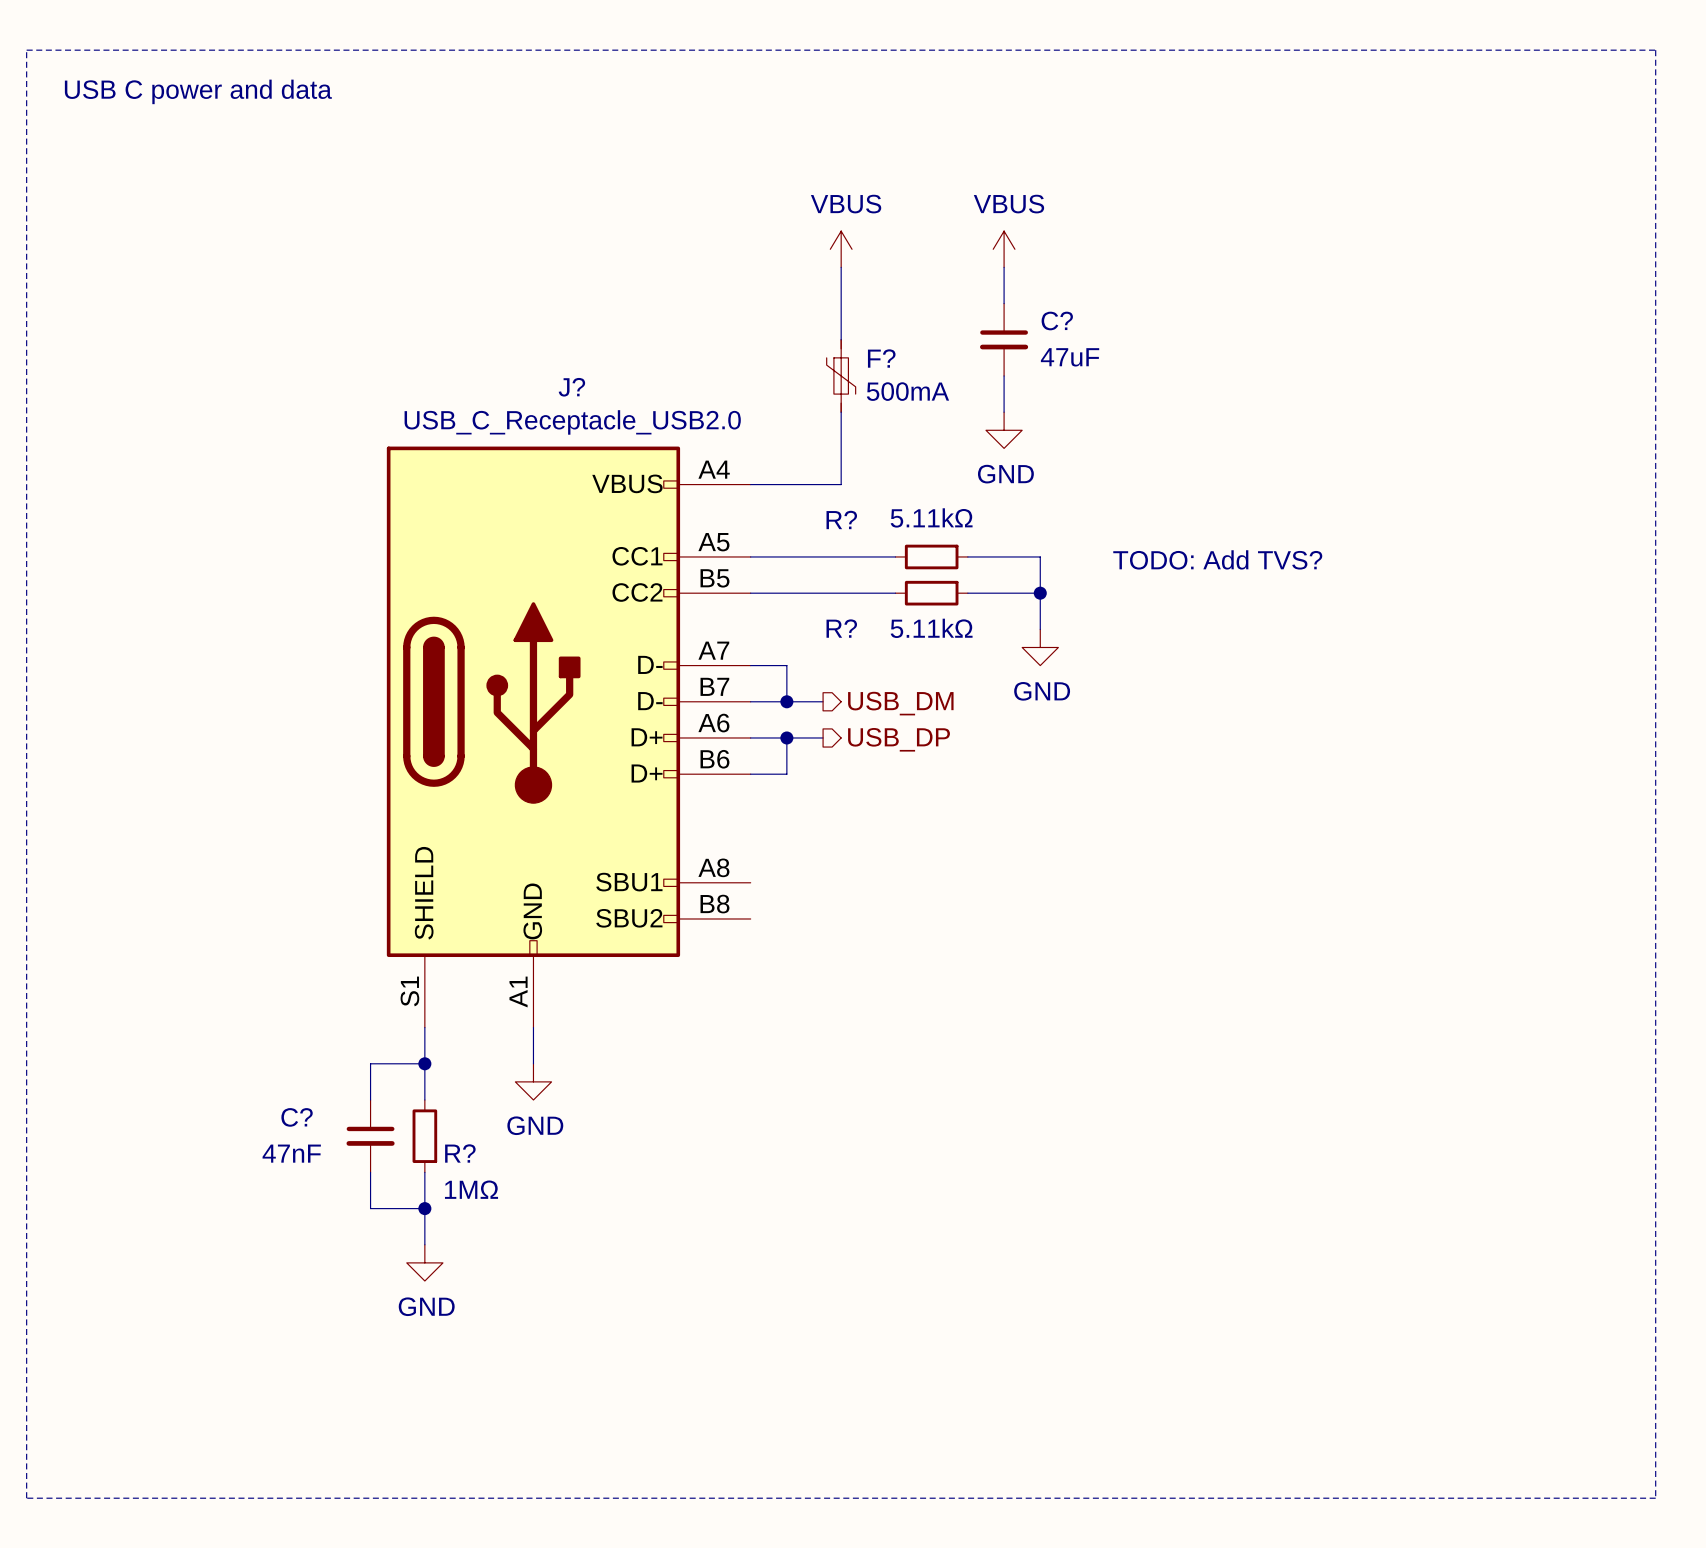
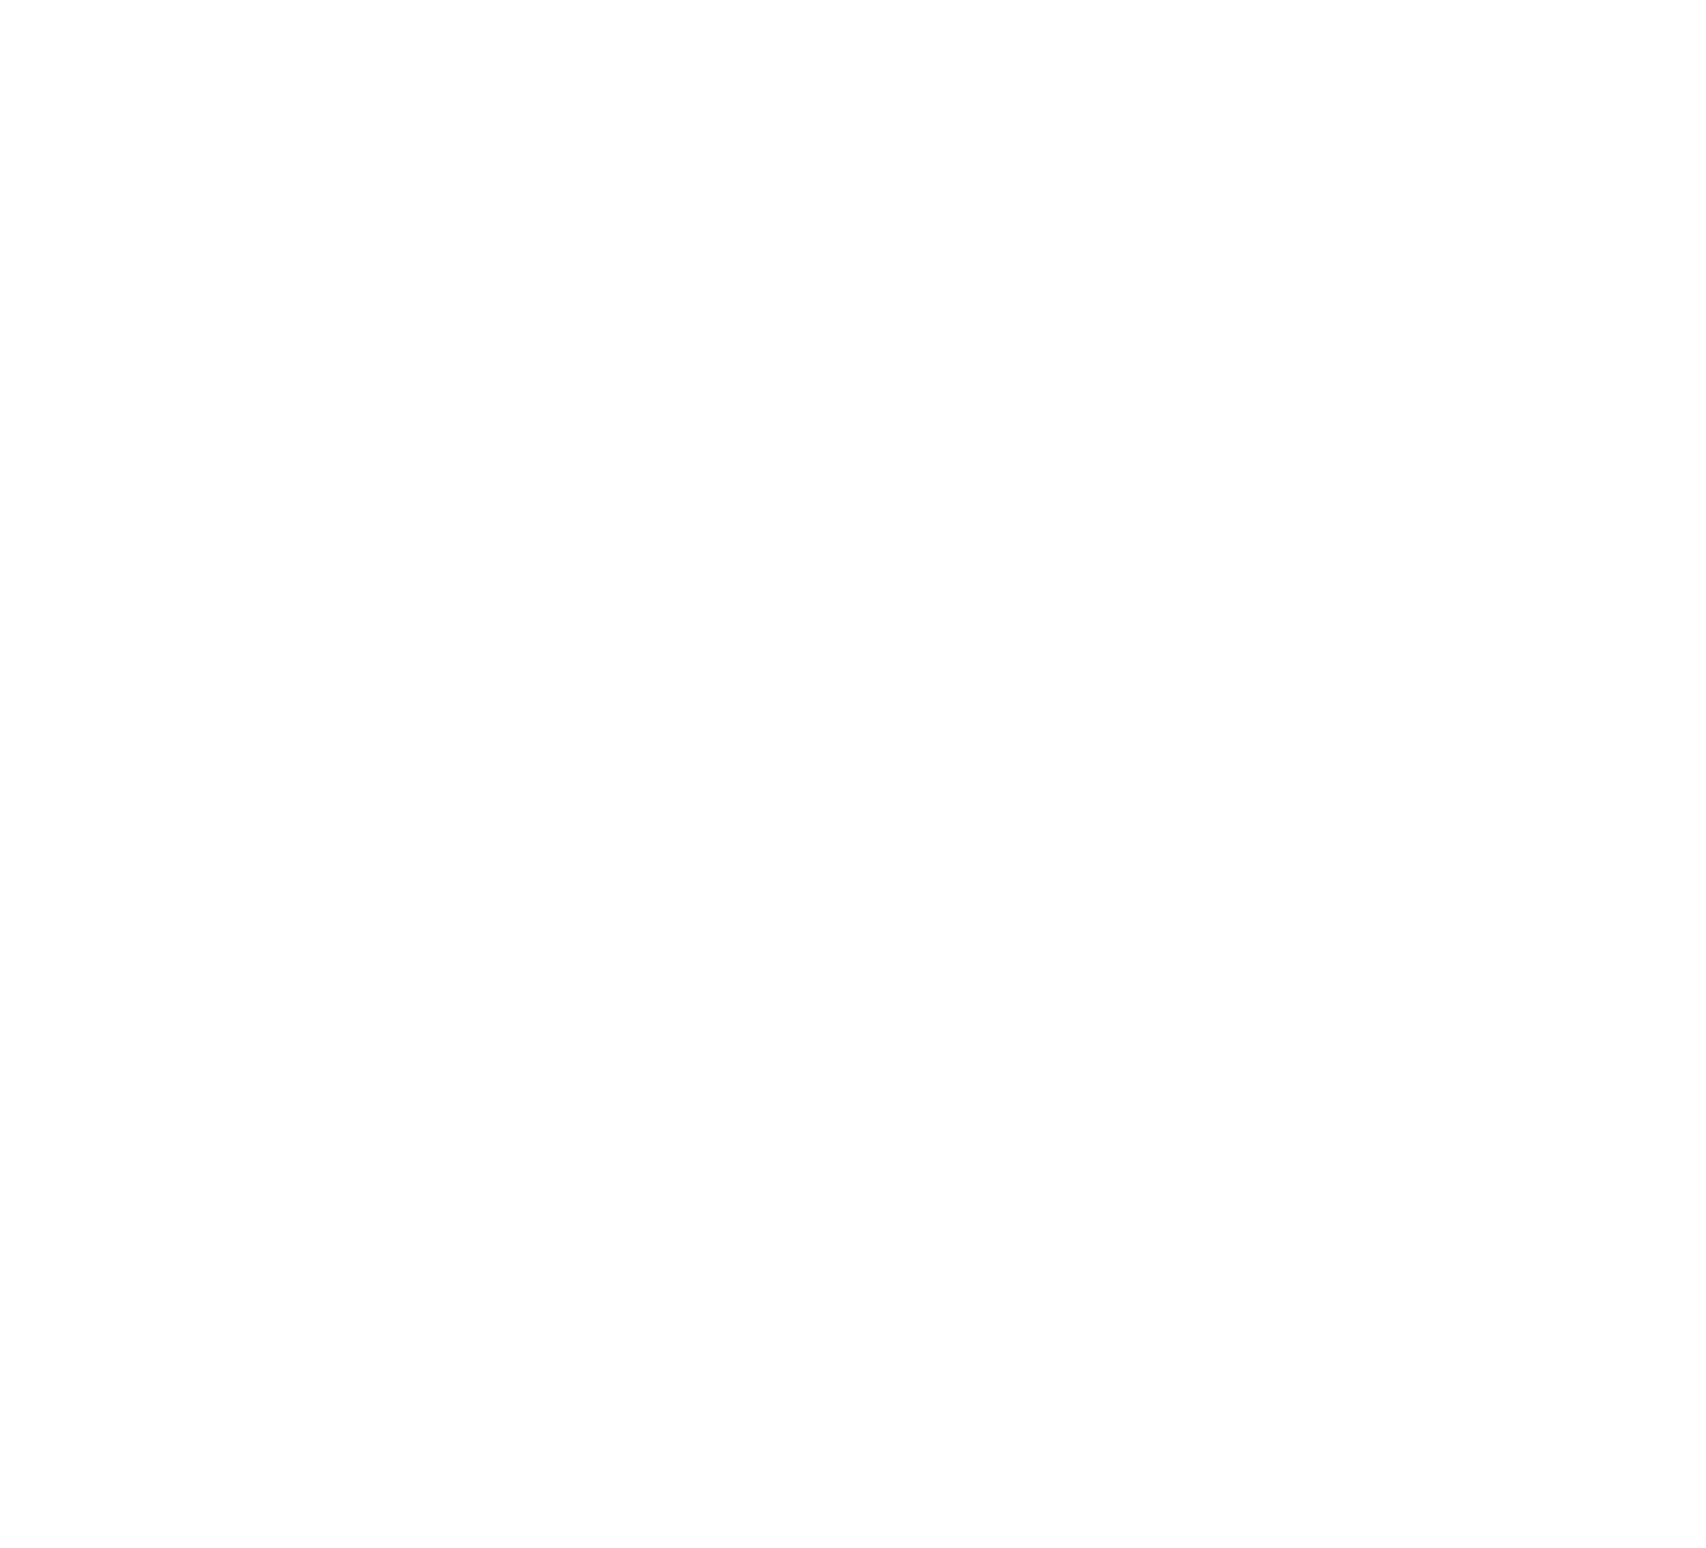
line: (26, 50) (1655, 50) (1655, 1498) (26, 1498) (26, 50) -> none
text: USB C power and data (198, 91) -> none
power symbol: VBUS (841, 249) -> none
power symbol: VBUS (1004, 249) -> none
wire: (841, 267) (841, 339) -> none
wire: (1004, 267) (1004, 303) -> none
C?: 47uF (1004, 339) -> none
F?: 500mA (841, 375) -> none
wire: (1004, 375) (1004, 412) -> none
wire: (841, 412) (841, 484) (750, 484) -> none
power symbol: GND (1004, 430) -> none
wire: (750, 556) (895, 556) -> none
R?: 5.11kΩ (931, 556) -> none
wire: (967, 556) (1040, 556) (1040, 629) -> none
text: TODO: Add TVS? (1217, 559) -> none
wire: (750, 593) (895, 593) -> none
R?: 5.11kΩ (931, 593) -> none
wire: (967, 593) (1040, 593) -> none
junction: (1040, 593) -> none
power symbol: GND (1040, 647) -> none
wire: (750, 665) (786, 665) (786, 701) -> none
wire: (750, 701) (823, 701) -> none
junction: (786, 701) -> none
hierarchical label: USB_DM (900, 703) -> none
J?: USB_C_Receptacle_USB2.0 (568, 737) -> none
wire: (750, 737) (823, 737) -> none
wire: (786, 737) (786, 774) (750, 774) -> none
junction: (786, 737) -> none
hierarchical label: USB_DP (899, 739) -> none
wire: (424, 1027) (424, 1100) -> none
wire: (533, 1027) (533, 1063) -> none
wire: (424, 1063) (370, 1063) (370, 1100) -> none
junction: (424, 1063) -> none
power symbol: GND (533, 1081) -> none
C?: 47nF (370, 1136) -> none
R?: 1MΩ (424, 1136) -> none
wire: (370, 1172) (370, 1208) (424, 1208) -> none
wire: (424, 1172) (424, 1244) -> none
junction: (424, 1208) -> none
power symbol: GND (424, 1262) -> none

